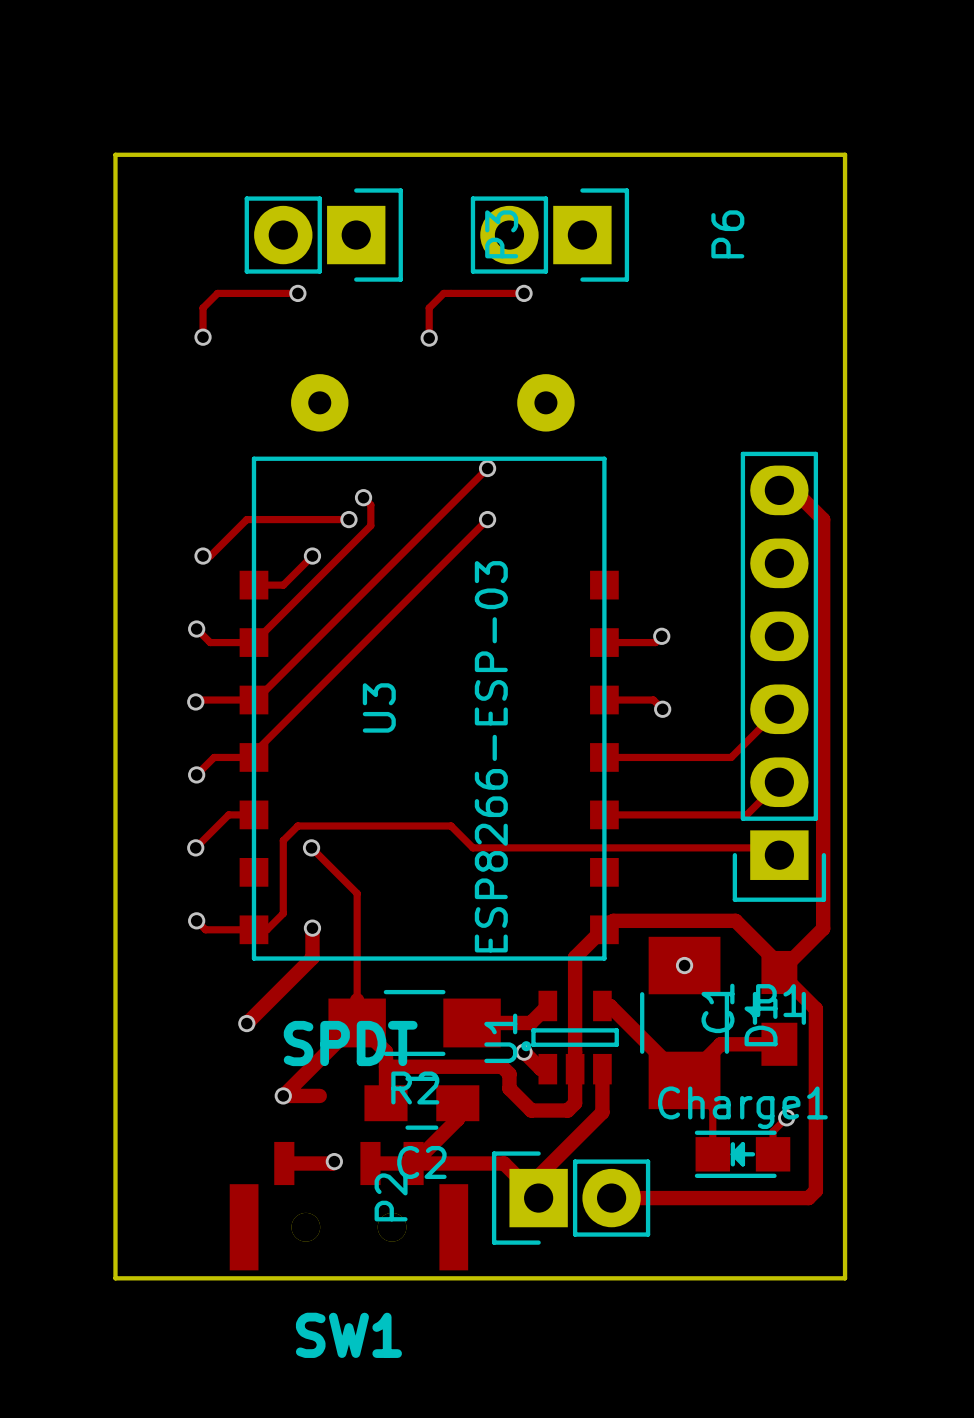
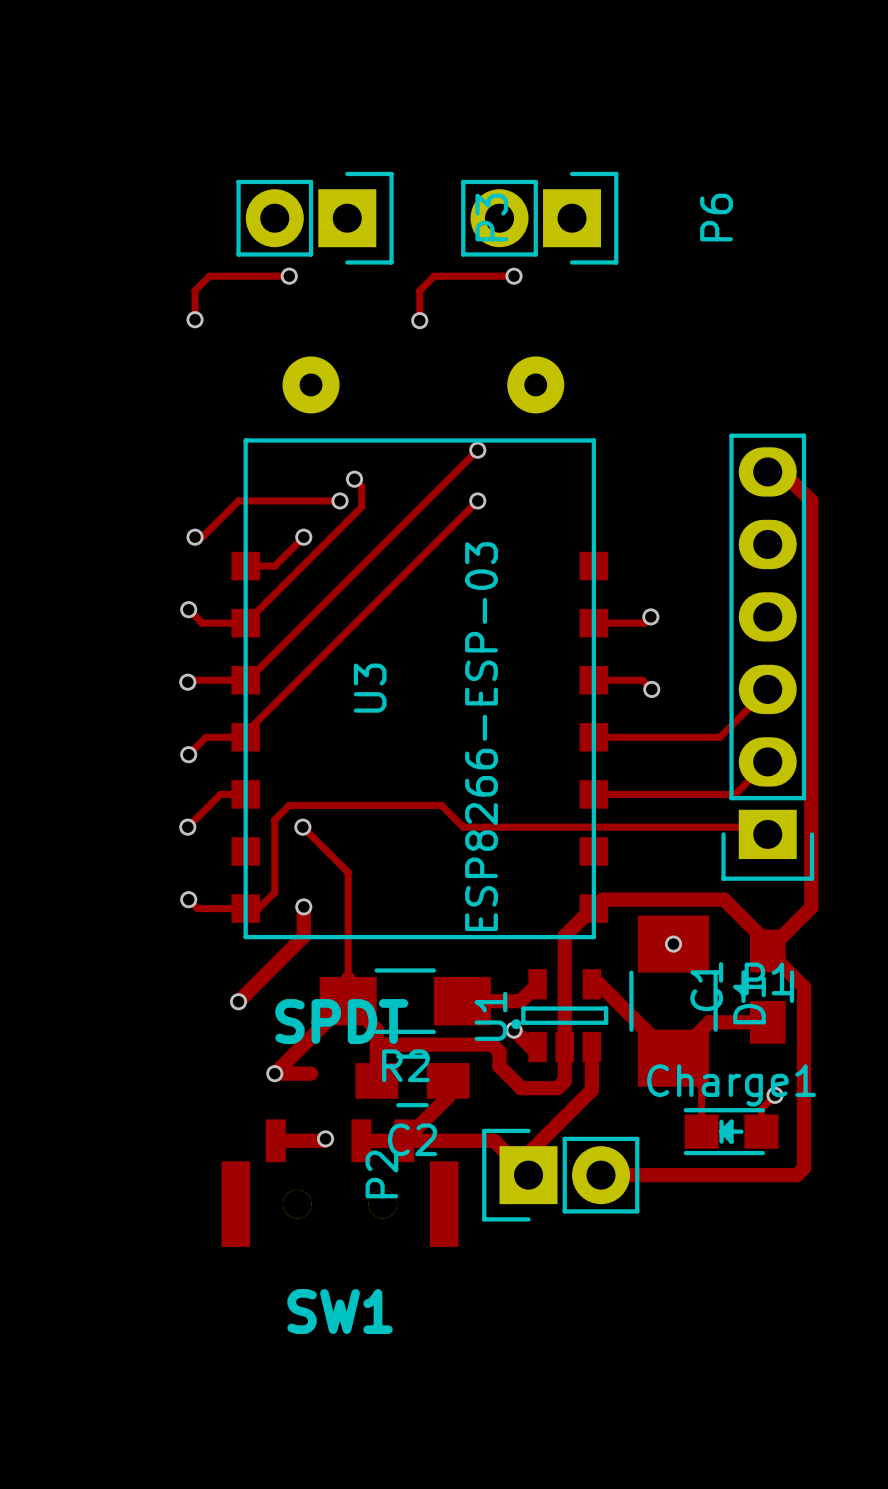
board edge: (115, 154) (115, 1278) (845, 1278) (845, 154) (115, 154) -> none

